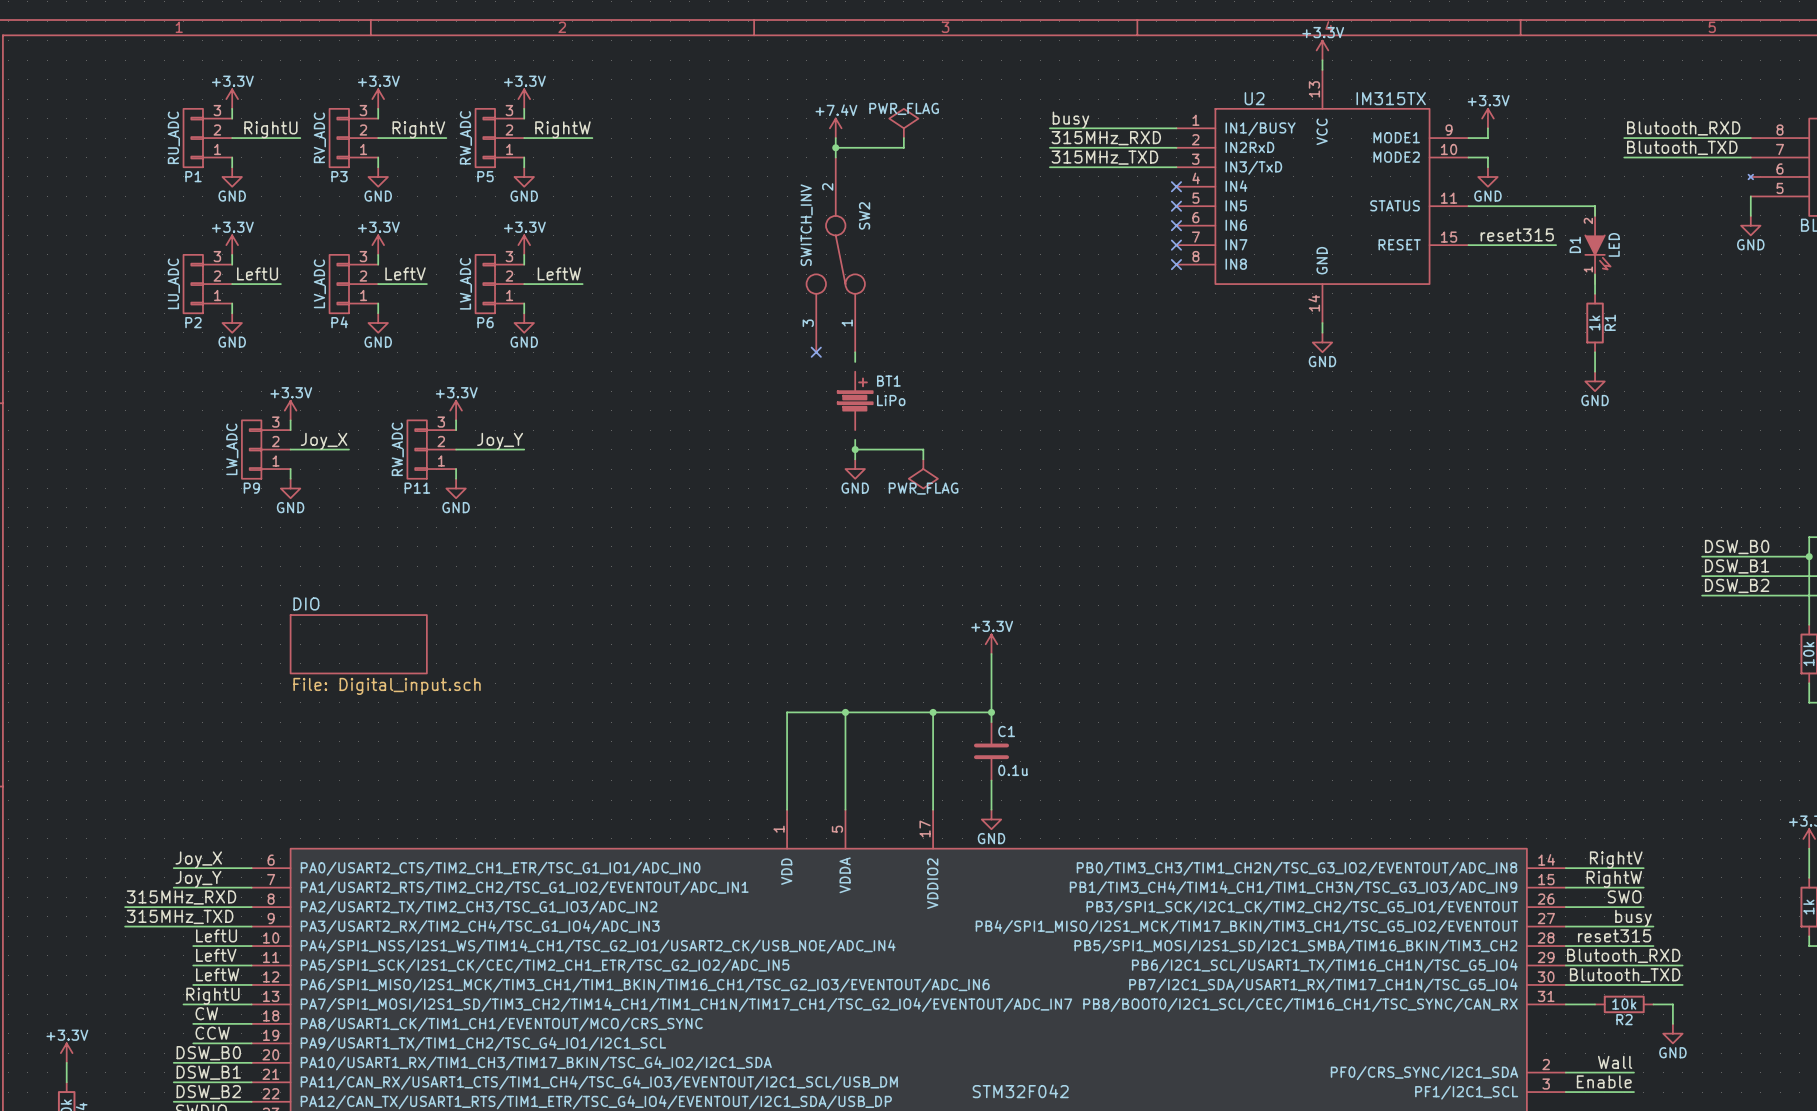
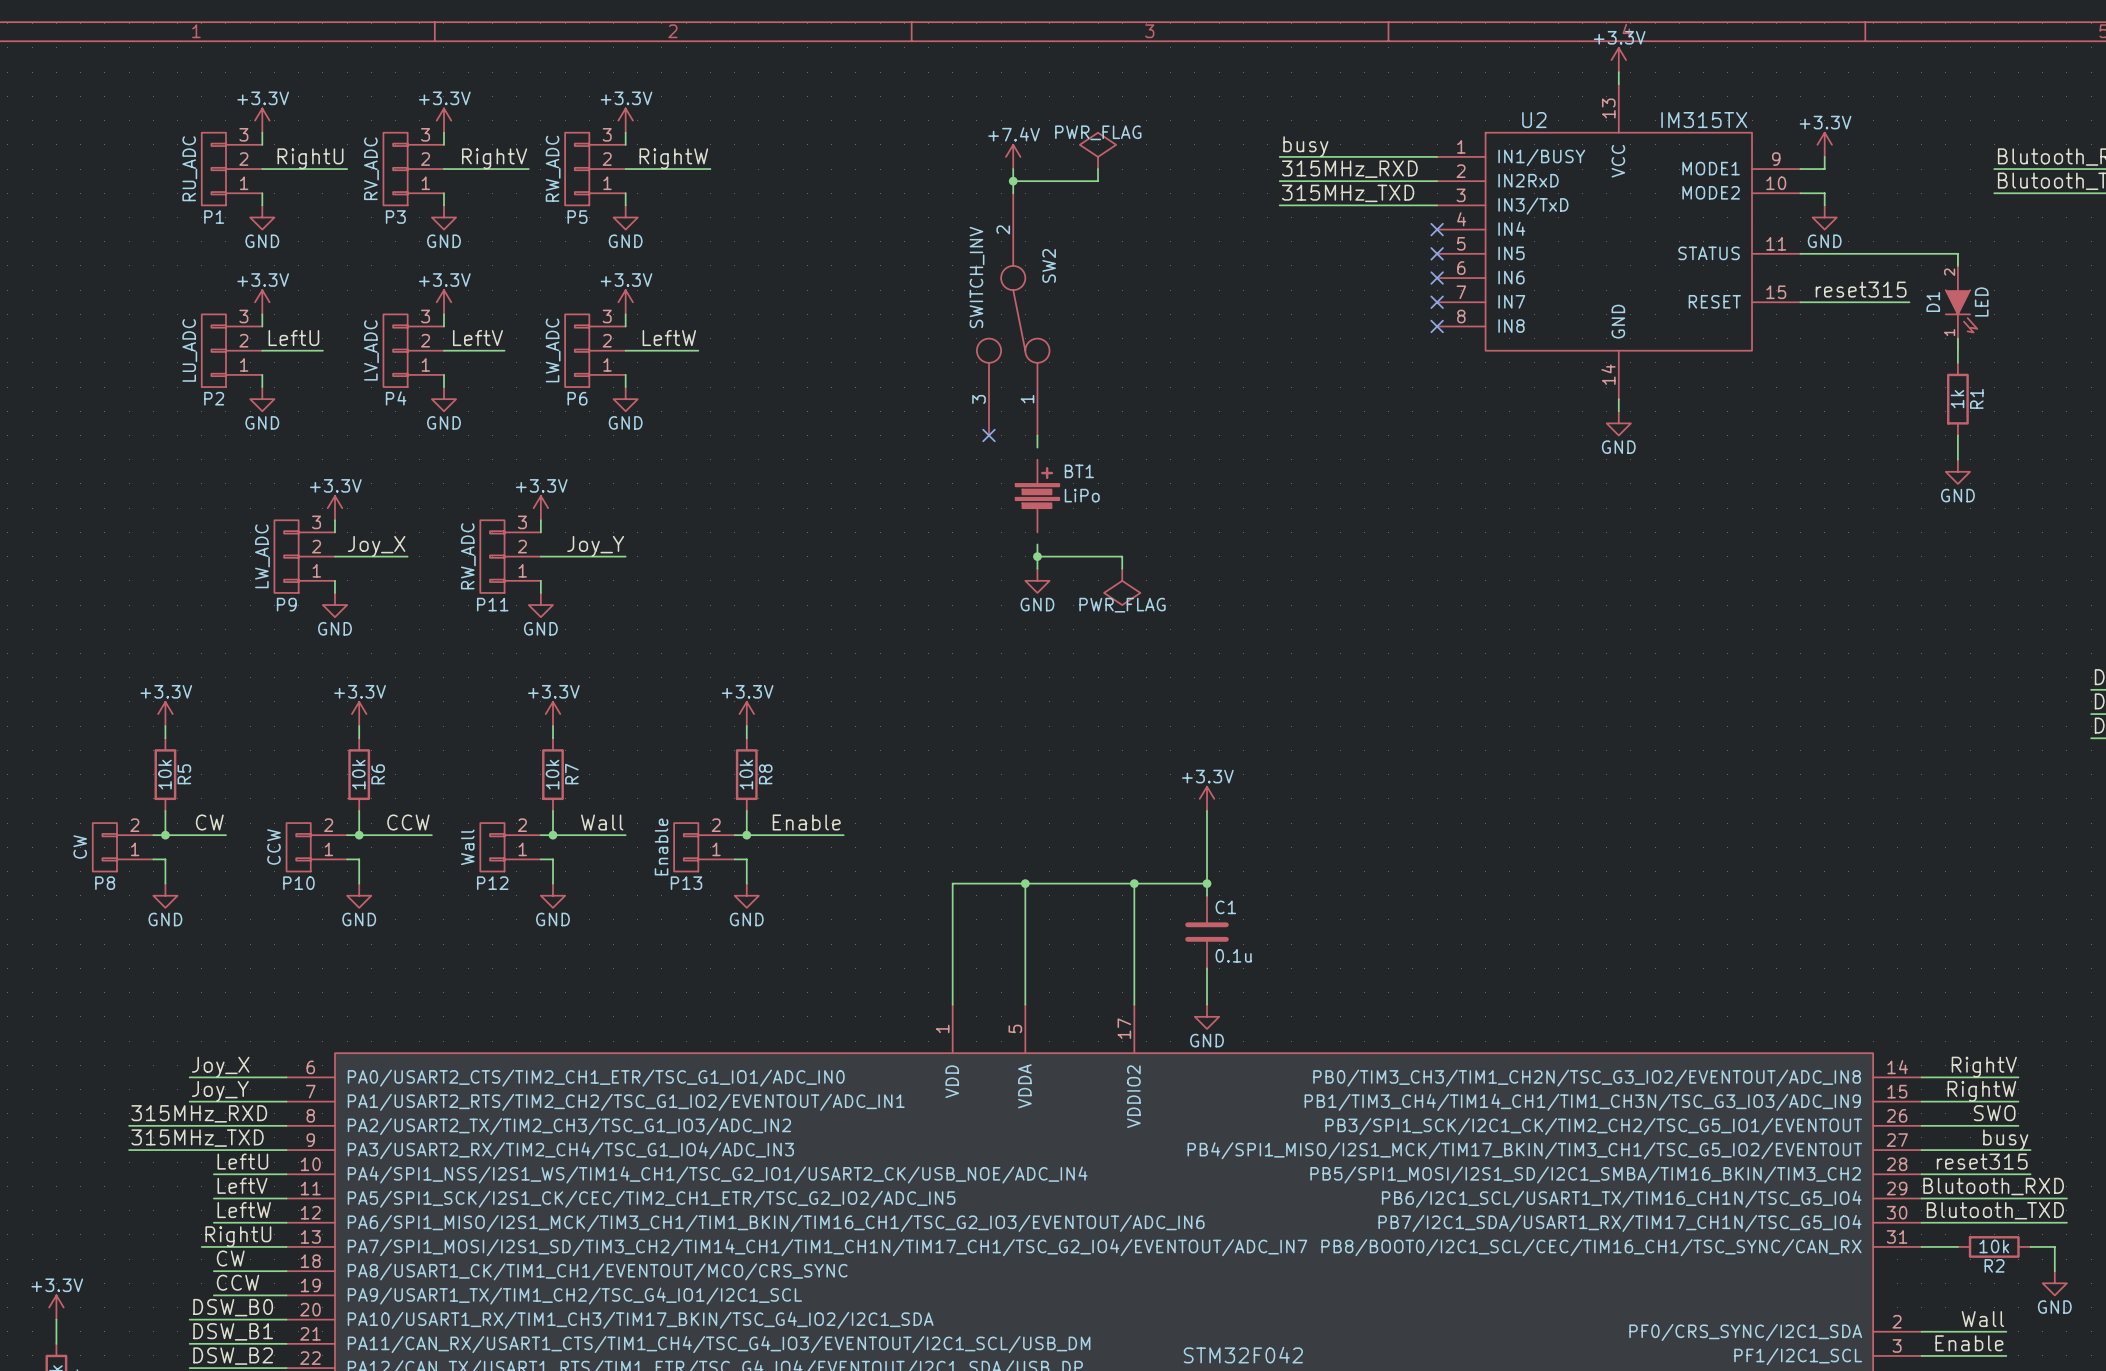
power symbol: none -> +3.3V (165, 714)
power symbol: none -> +3.3V (359, 714)
power symbol: none -> +3.3V (552, 714)
power symbol: none -> +3.3V (746, 714)
wire: none -> (165, 726) (165, 738)
wire: none -> (359, 726) (359, 738)
wire: none -> (552, 726) (552, 738)
wire: none -> (746, 726) (746, 738)
R5: none -> 10k (165, 774)
R6: none -> 10k (359, 774)
R7: none -> 10k (552, 774)
R8: none -> 10k (746, 774)
sheet DIO: File: Digital_input.sch (358, 644) -> none
wire: none -> (165, 810) (165, 835)
wire: none -> (359, 810) (359, 835)
wire: none -> (552, 810) (552, 835)
wire: none -> (746, 810) (746, 835)
label: none -> CW (209, 822)
label: none -> CCW (408, 822)
label: none -> Wall (602, 822)
label: none -> Enable (806, 822)
wire: none -> (153, 835) (225, 835)
junction: none -> (165, 835)
junction: none -> (359, 835)
wire: none -> (540, 835) (625, 835)
junction: none -> (552, 835)
wire: none -> (734, 835) (843, 835)
junction: none -> (746, 835)
P8: none -> CW (123, 847)
P10: none -> CCW (316, 847)
P12: none -> Wall (510, 847)
P13: none -> Enable (704, 847)
wire: none -> (153, 859) (165, 859) (165, 883)
wire: none -> (347, 859) (359, 859) (359, 883)
wire: none -> (540, 859) (552, 859) (552, 883)
wire: none -> (734, 859) (746, 859) (746, 883)
power symbol: none -> GND (165, 895)
power symbol: none -> GND (359, 895)
power symbol: none -> GND (552, 895)
power symbol: none -> GND (746, 895)

